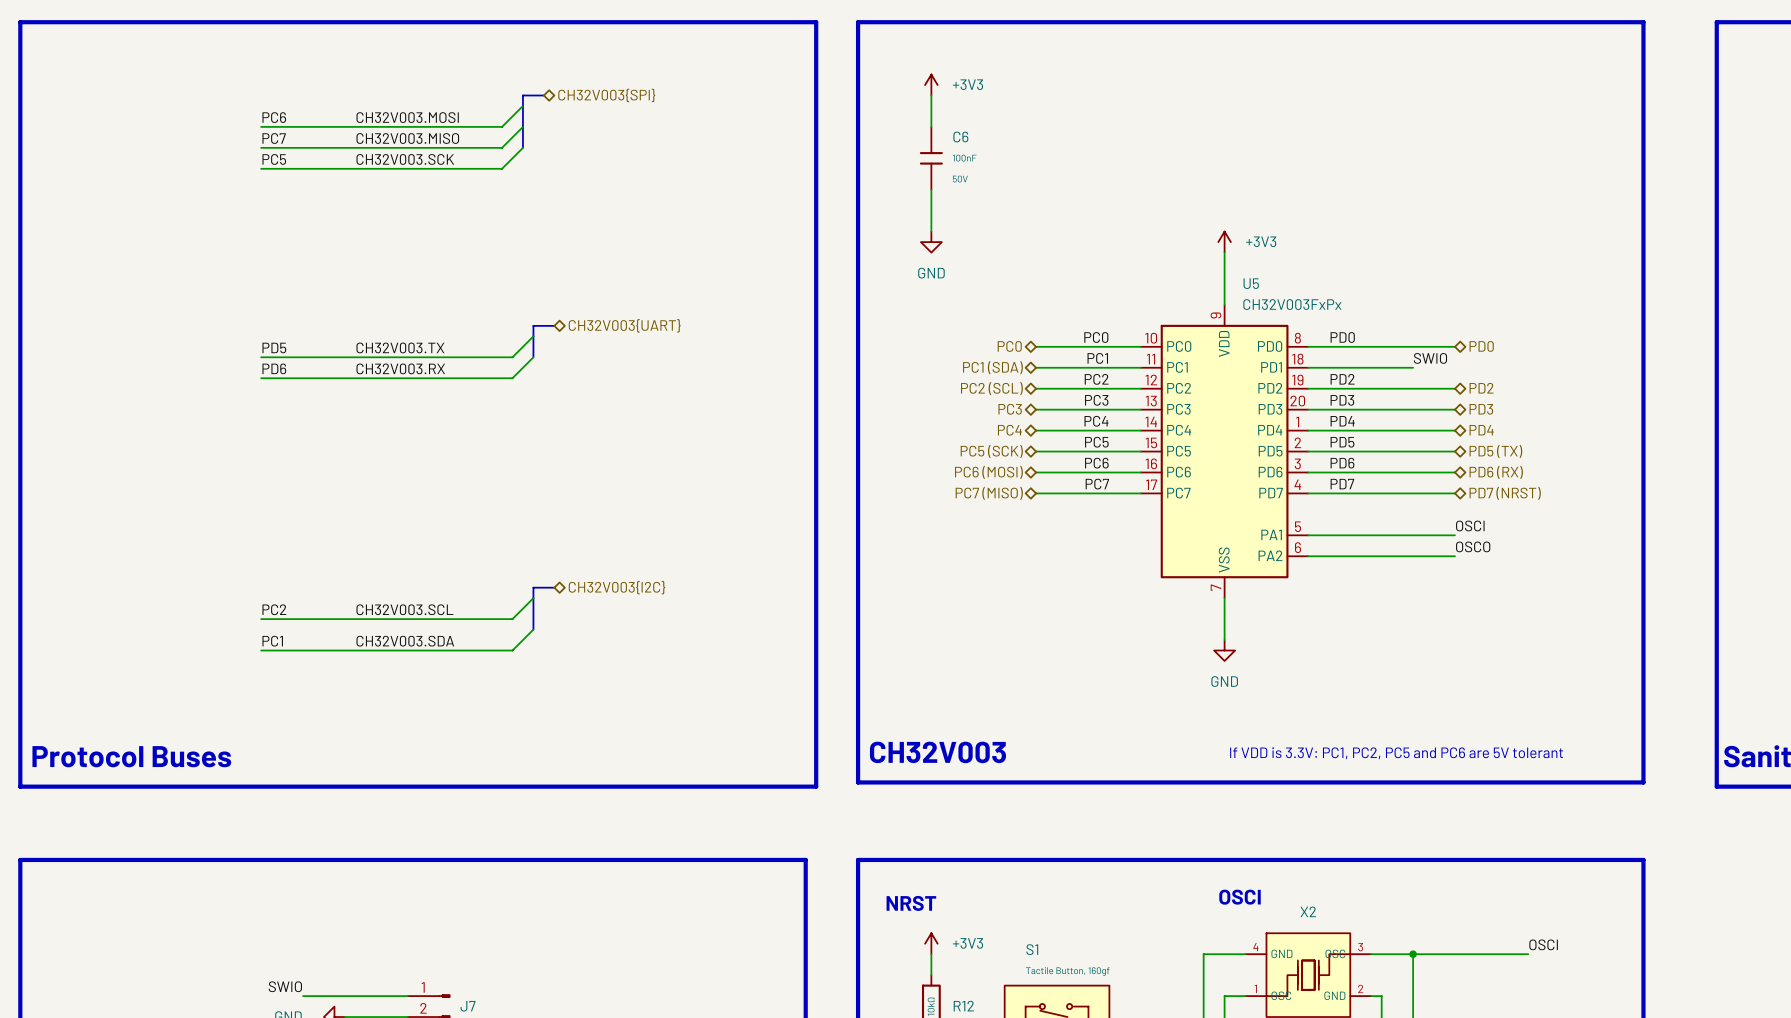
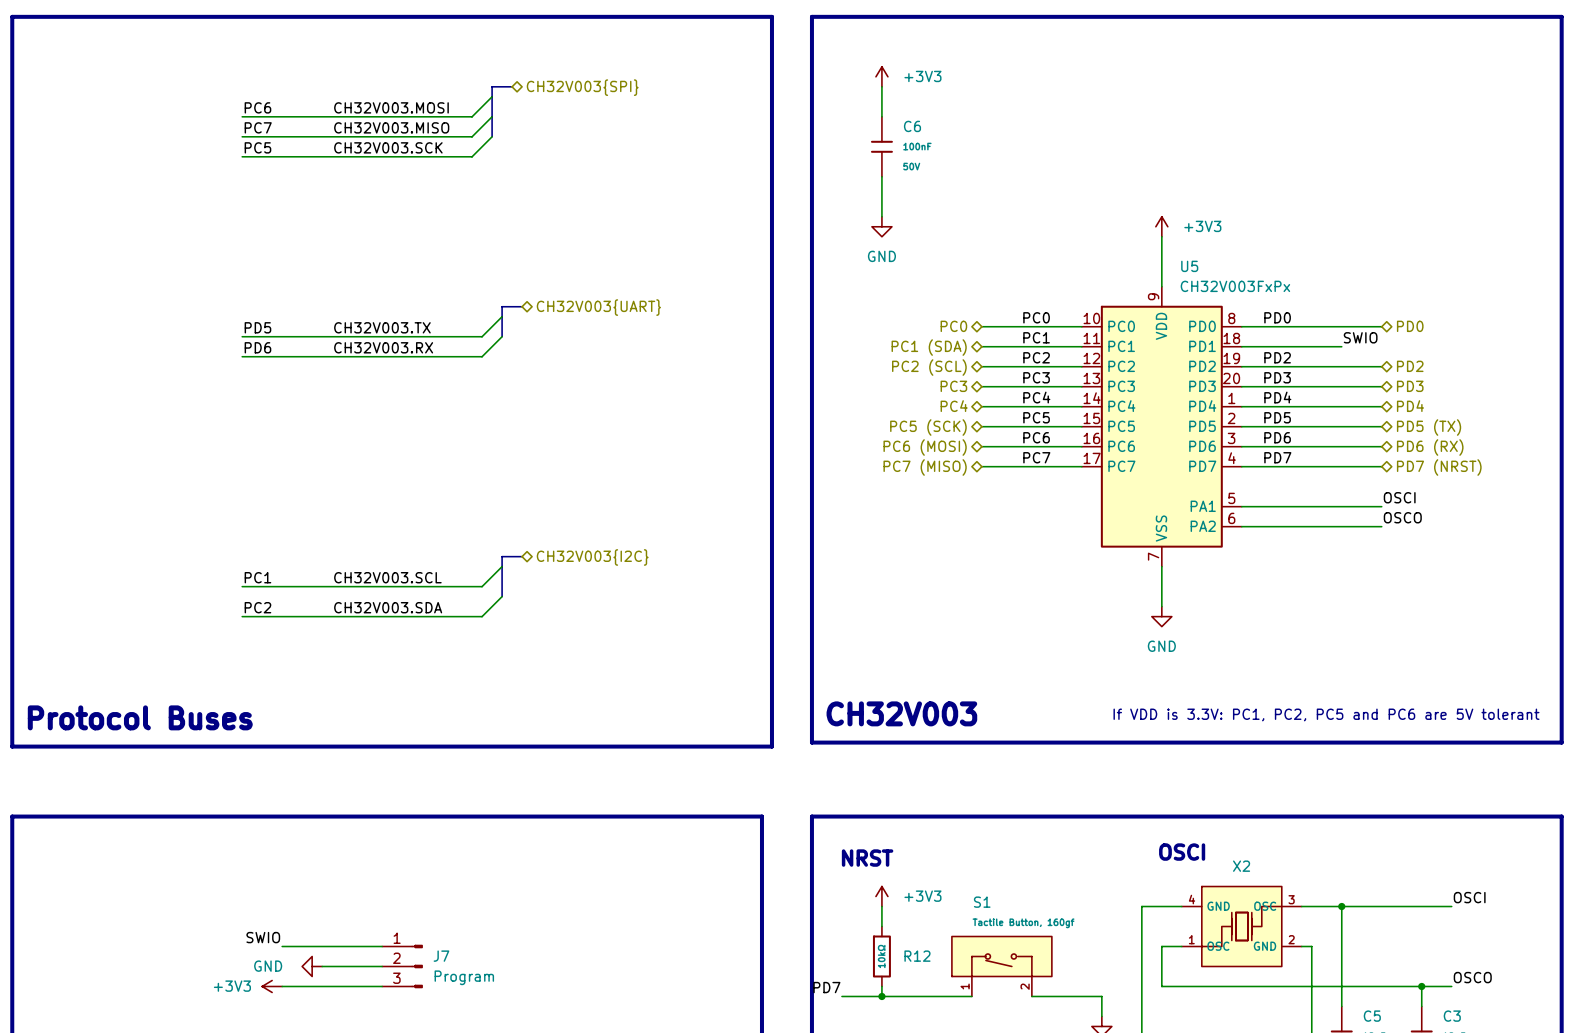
label: PC2 (274, 609) -> PC1 (257, 577)
label: PC1 (272, 641) -> PC2 (257, 607)

